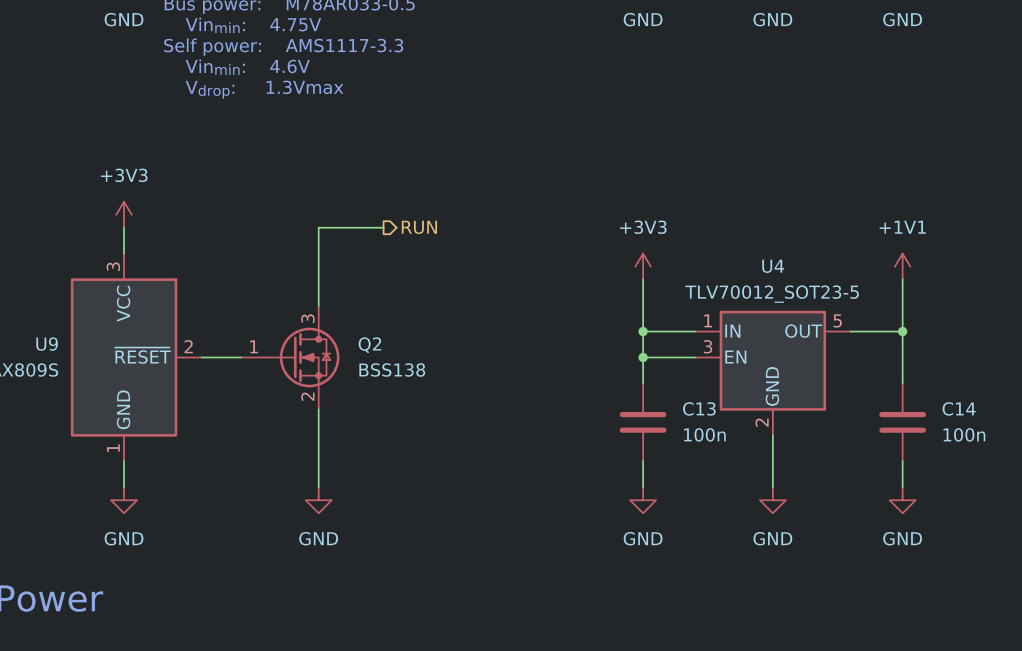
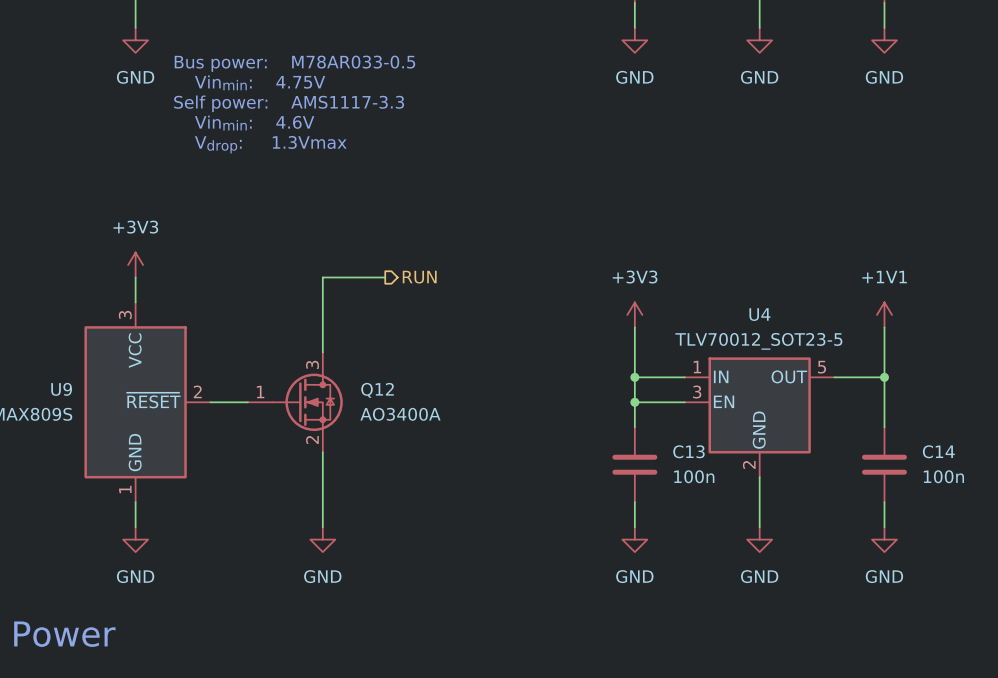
Q2 name: Q2 (369, 345) -> Q12 (377, 390)
Q2 value: BSS138 (392, 370) -> AO3400A (400, 414)

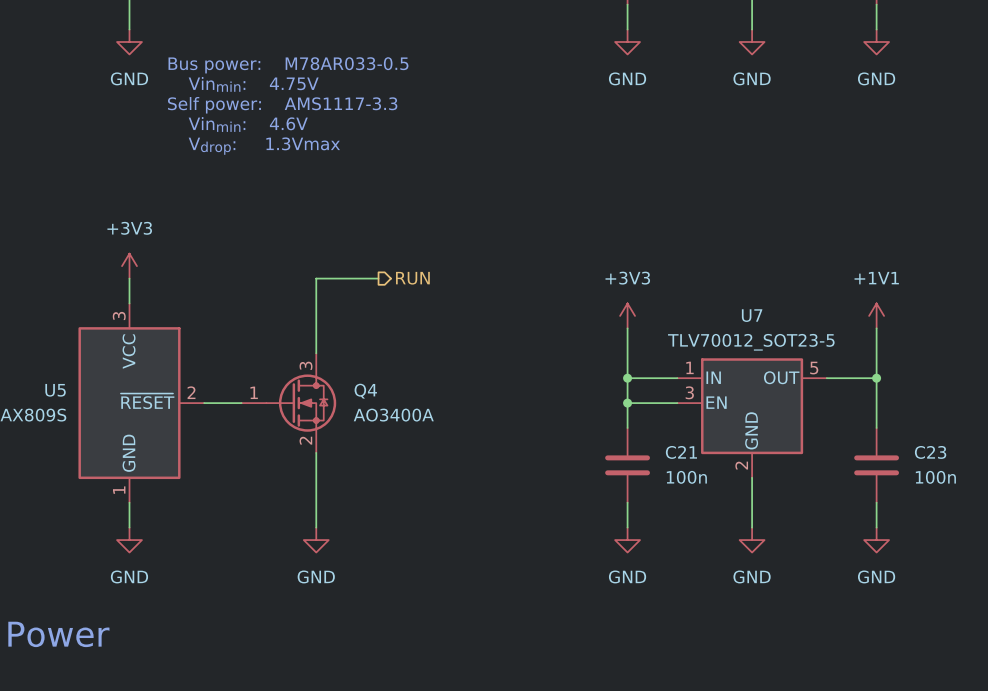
U4 name: U4 (759, 314) -> U7 (752, 315)
U9 name: U9 (61, 389) -> U5 (55, 390)
Q12 name: Q12 (377, 390) -> Q4 (365, 391)
C13 name: C13 (688, 451) -> C21 (681, 452)
C14 name: C14 (938, 451) -> C23 (930, 452)

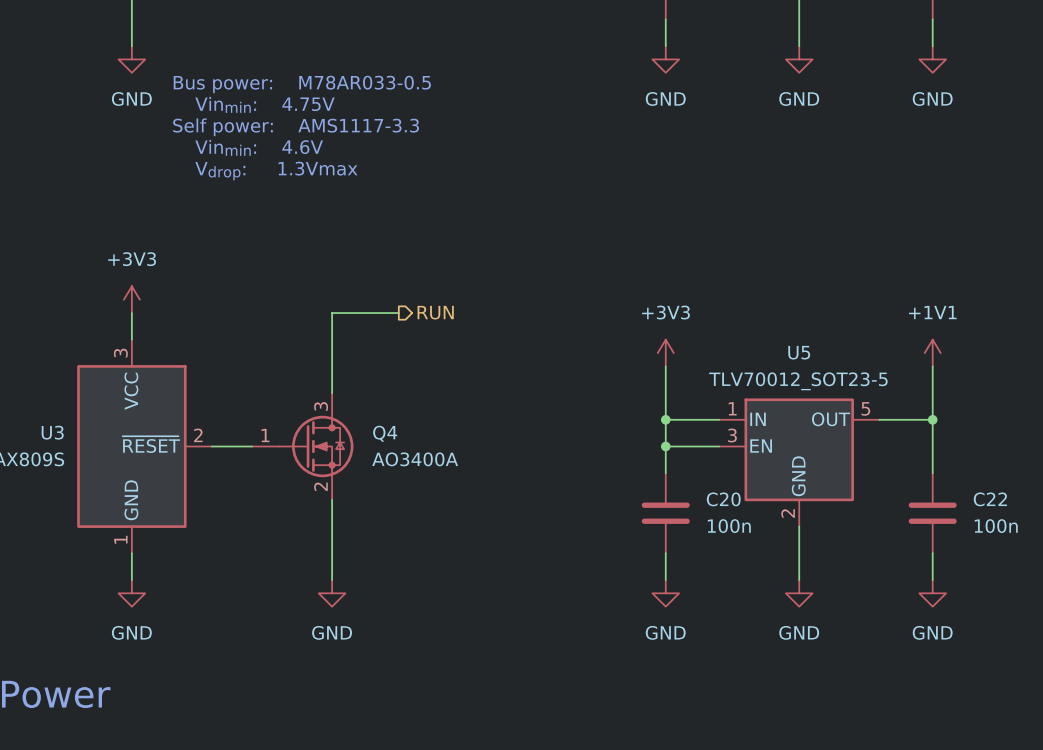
U7 name: U7 (752, 315) -> U5 (799, 352)
U5 name: U5 (55, 390) -> U3 (52, 432)
C21 name: C21 (681, 452) -> C20 (723, 499)
C23 name: C23 (930, 452) -> C22 (990, 499)

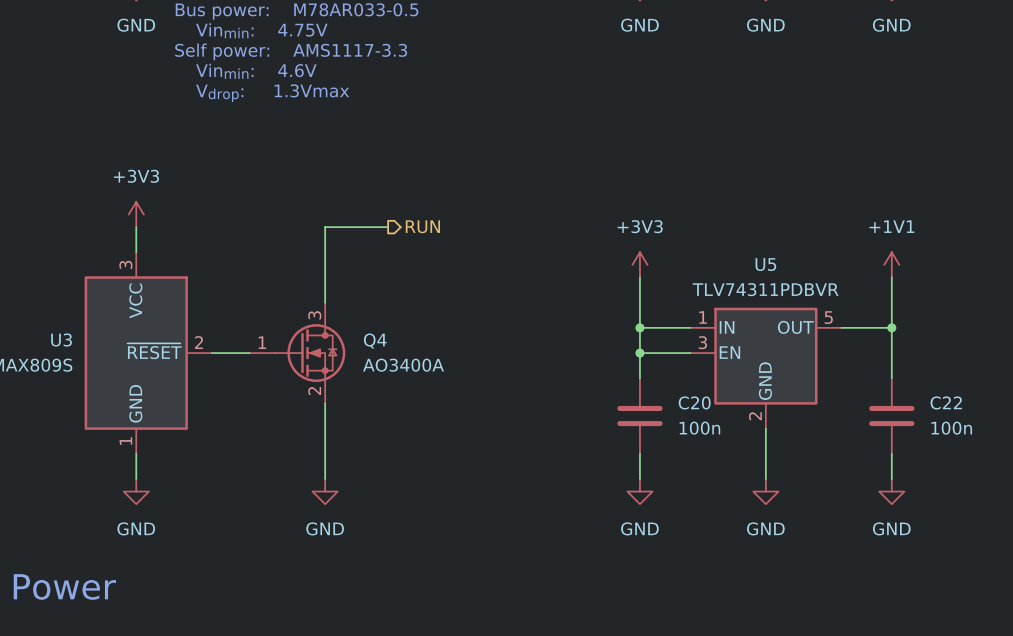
U5 value: TLV70012_SOT23-5 (798, 381) -> TLV74311PDBVR (765, 289)

